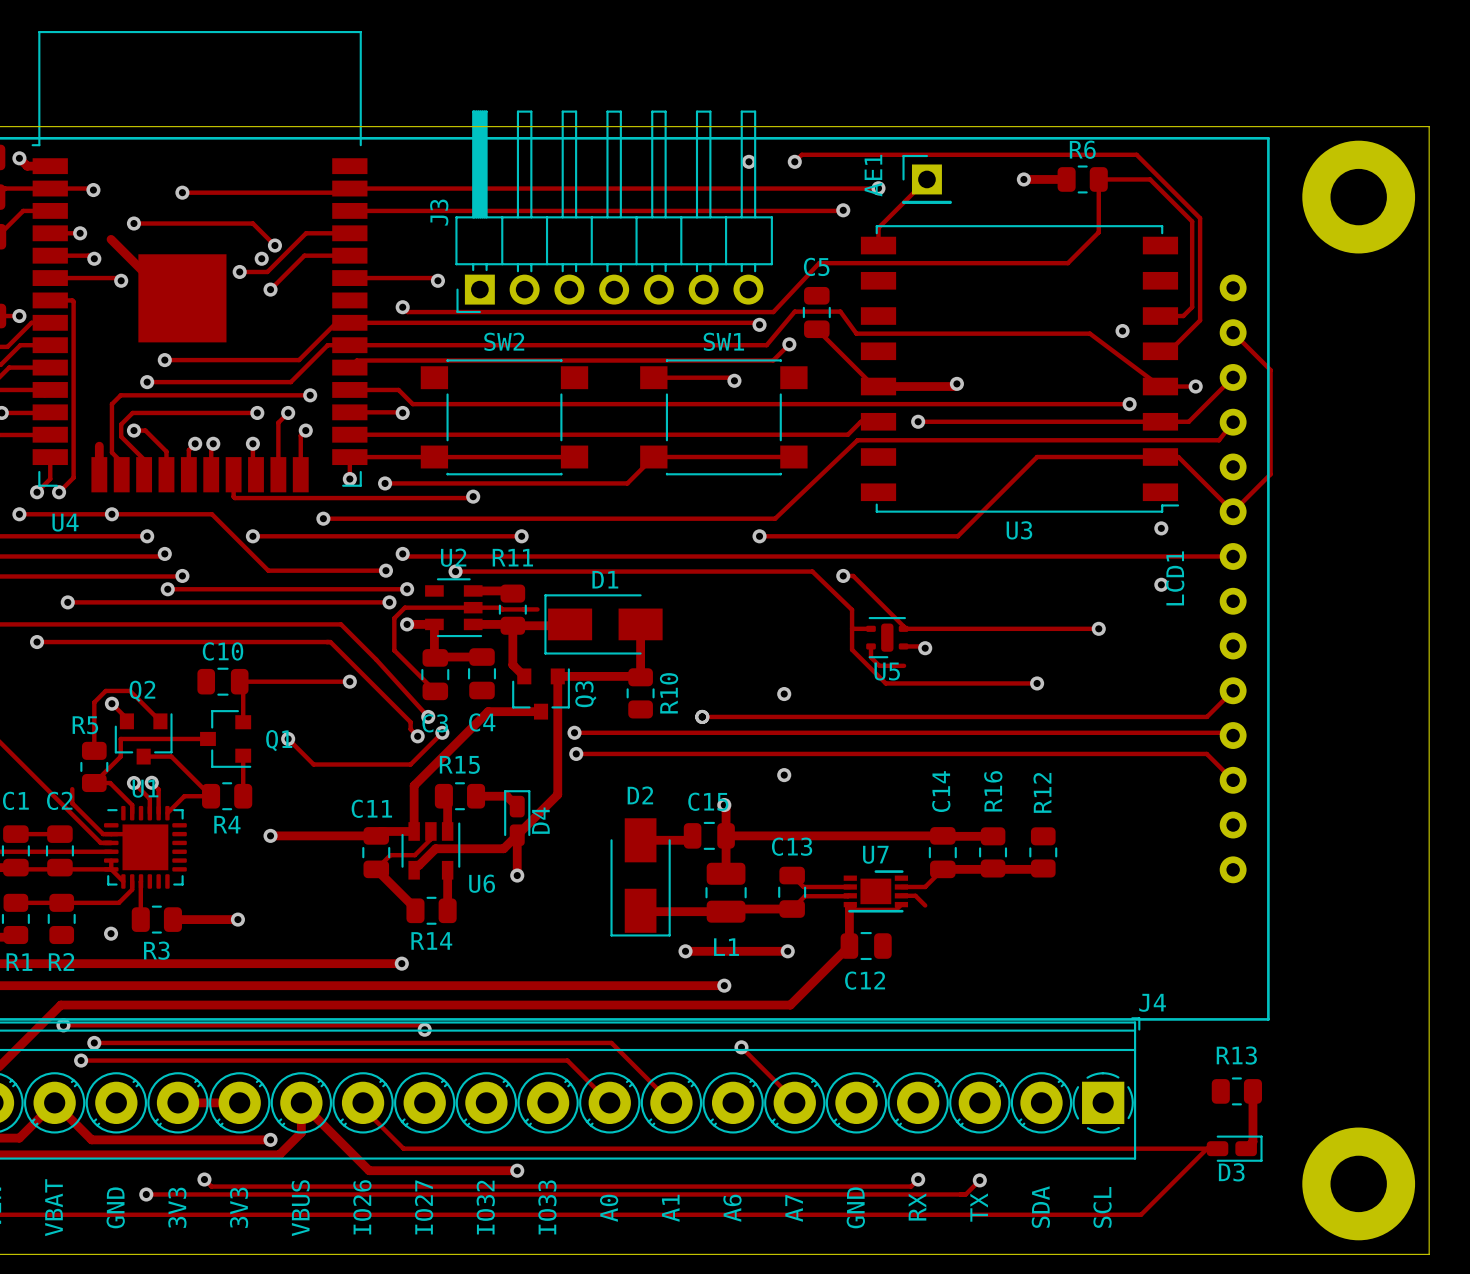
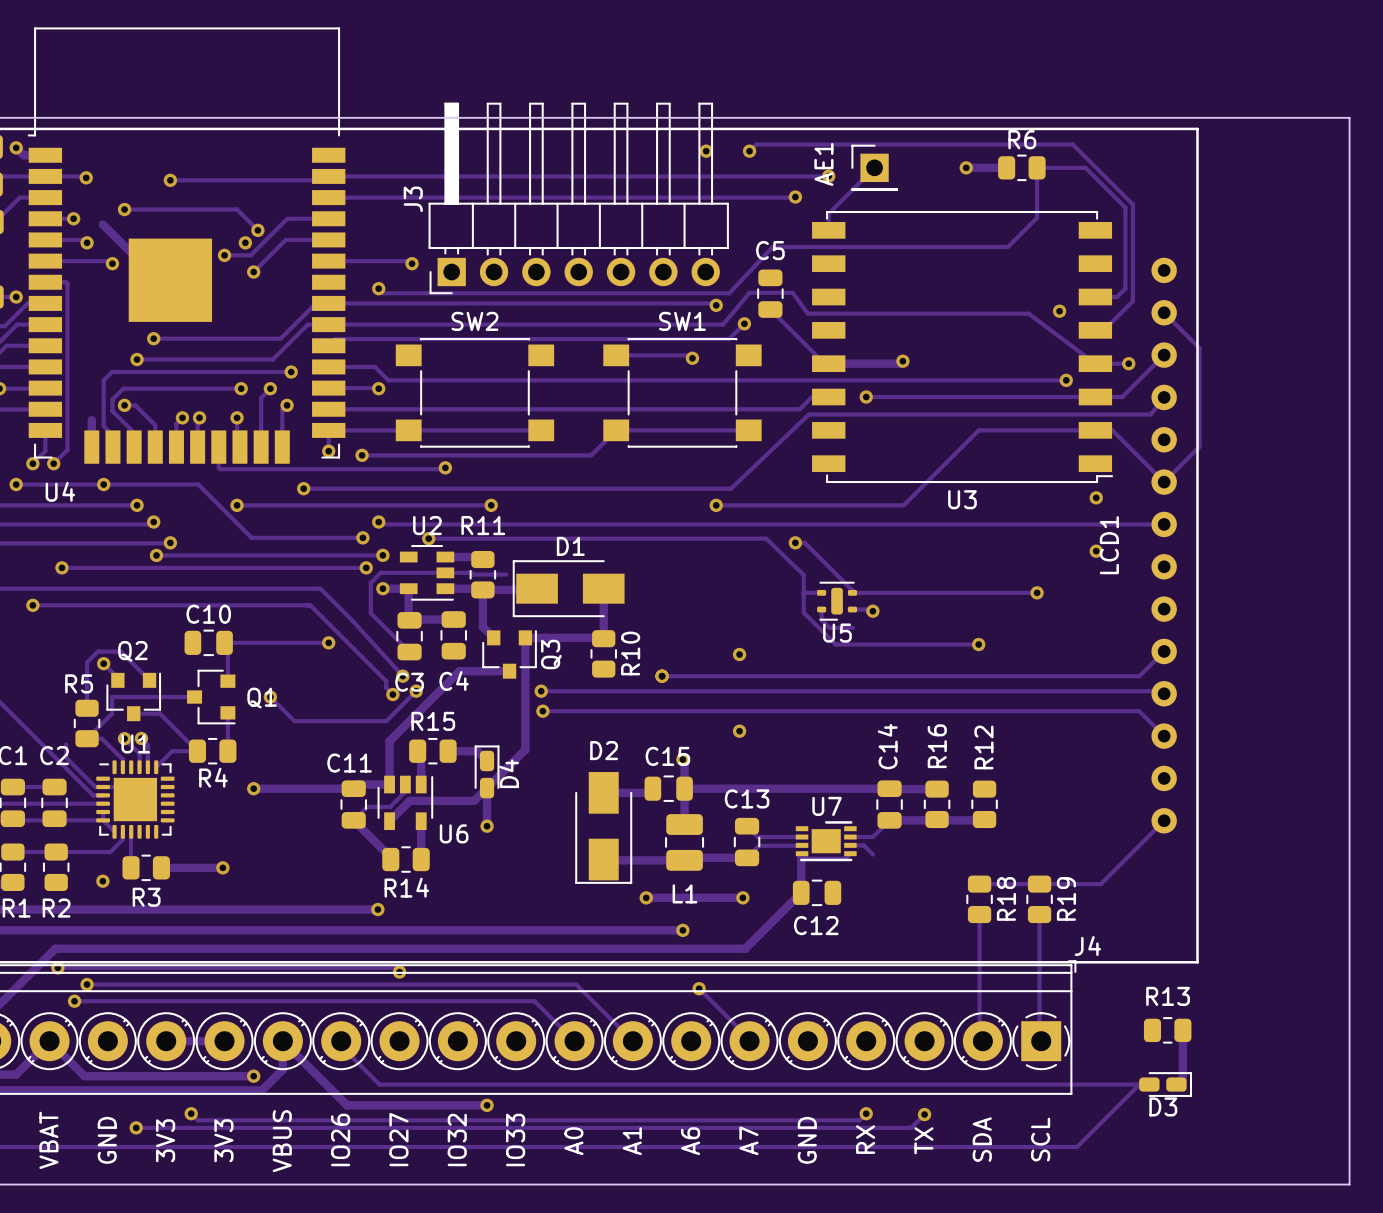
part: (1358, 197) -> none
track: none -> (1164, 820) (1100, 884) (979, 884)
R18: none -> (979, 899)
R19: none -> (1039, 899)
track: none -> (979, 914) (979, 1037) (982, 1041)
track: none -> (1039, 914) (1039, 1039) (1041, 1041)
part: (1358, 1183) -> none

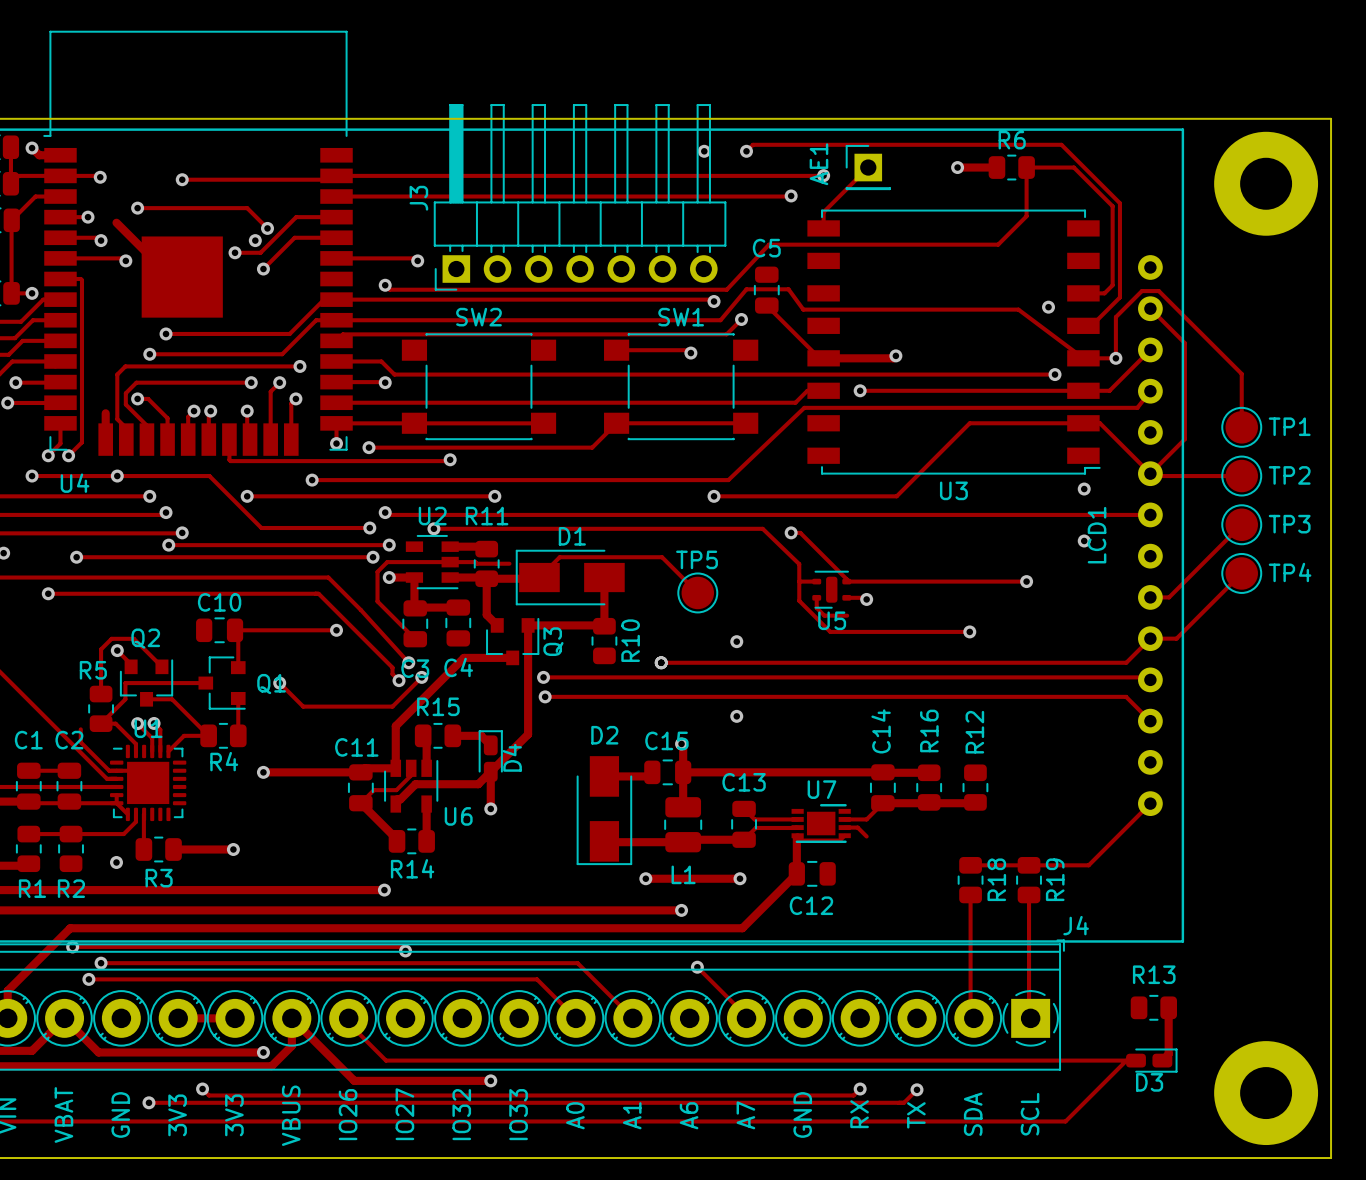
part: none -> (1266, 183)
track: none -> (1115, 358) (1115, 317) (1141, 291) (1158, 291) (1241, 373) (1241, 427)
TP1: none -> (1241, 427)
track: none -> (1150, 473) (1152, 476) (1241, 476)
TP2: none -> (1241, 476)
track: none -> (1241, 524) (1169, 597) (1150, 597)
TP3: none -> (1241, 524)
track: none -> (1241, 573) (1176, 638) (1150, 638)
TP4: none -> (1241, 573)
track: none -> (539, 577) (559, 557) (662, 557) (697, 592)
TP5: none -> (697, 592)
part: none -> (1266, 1093)

